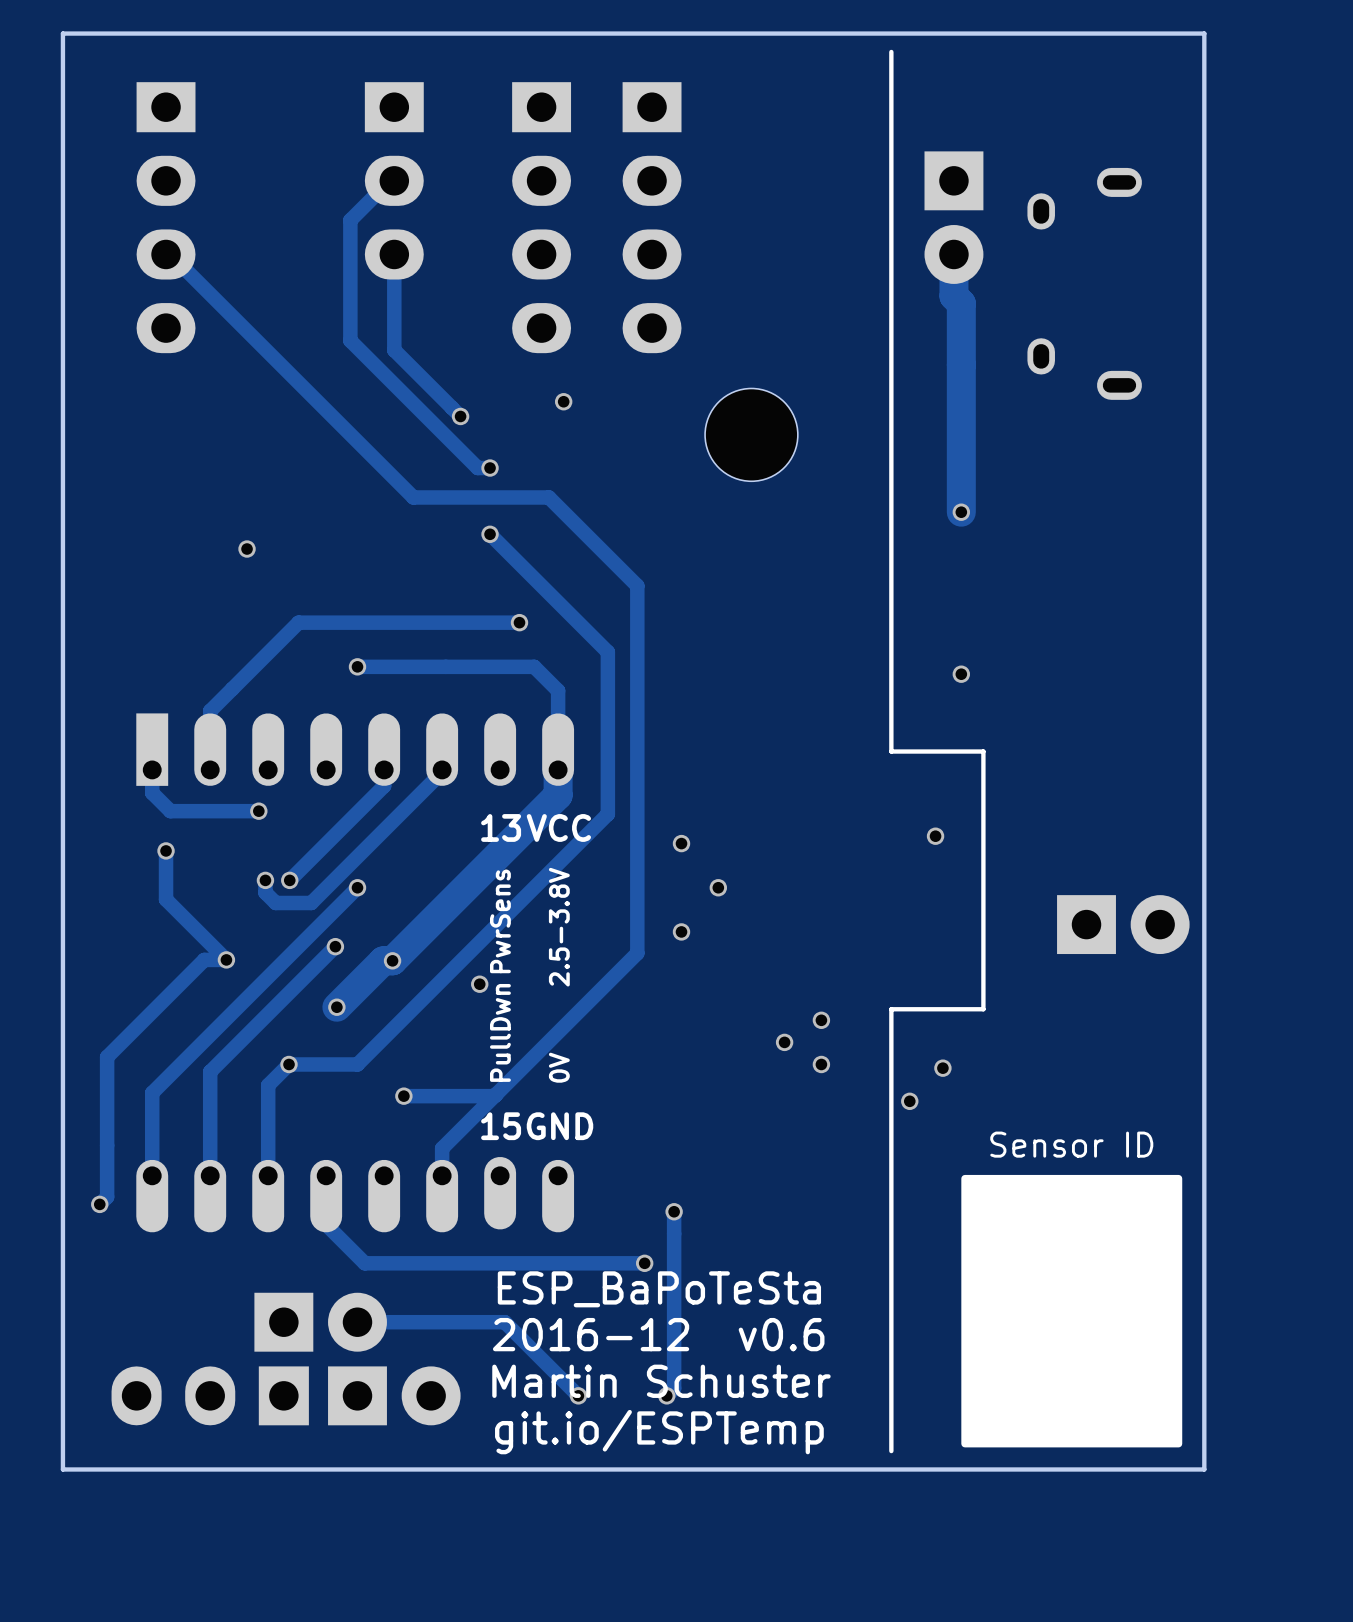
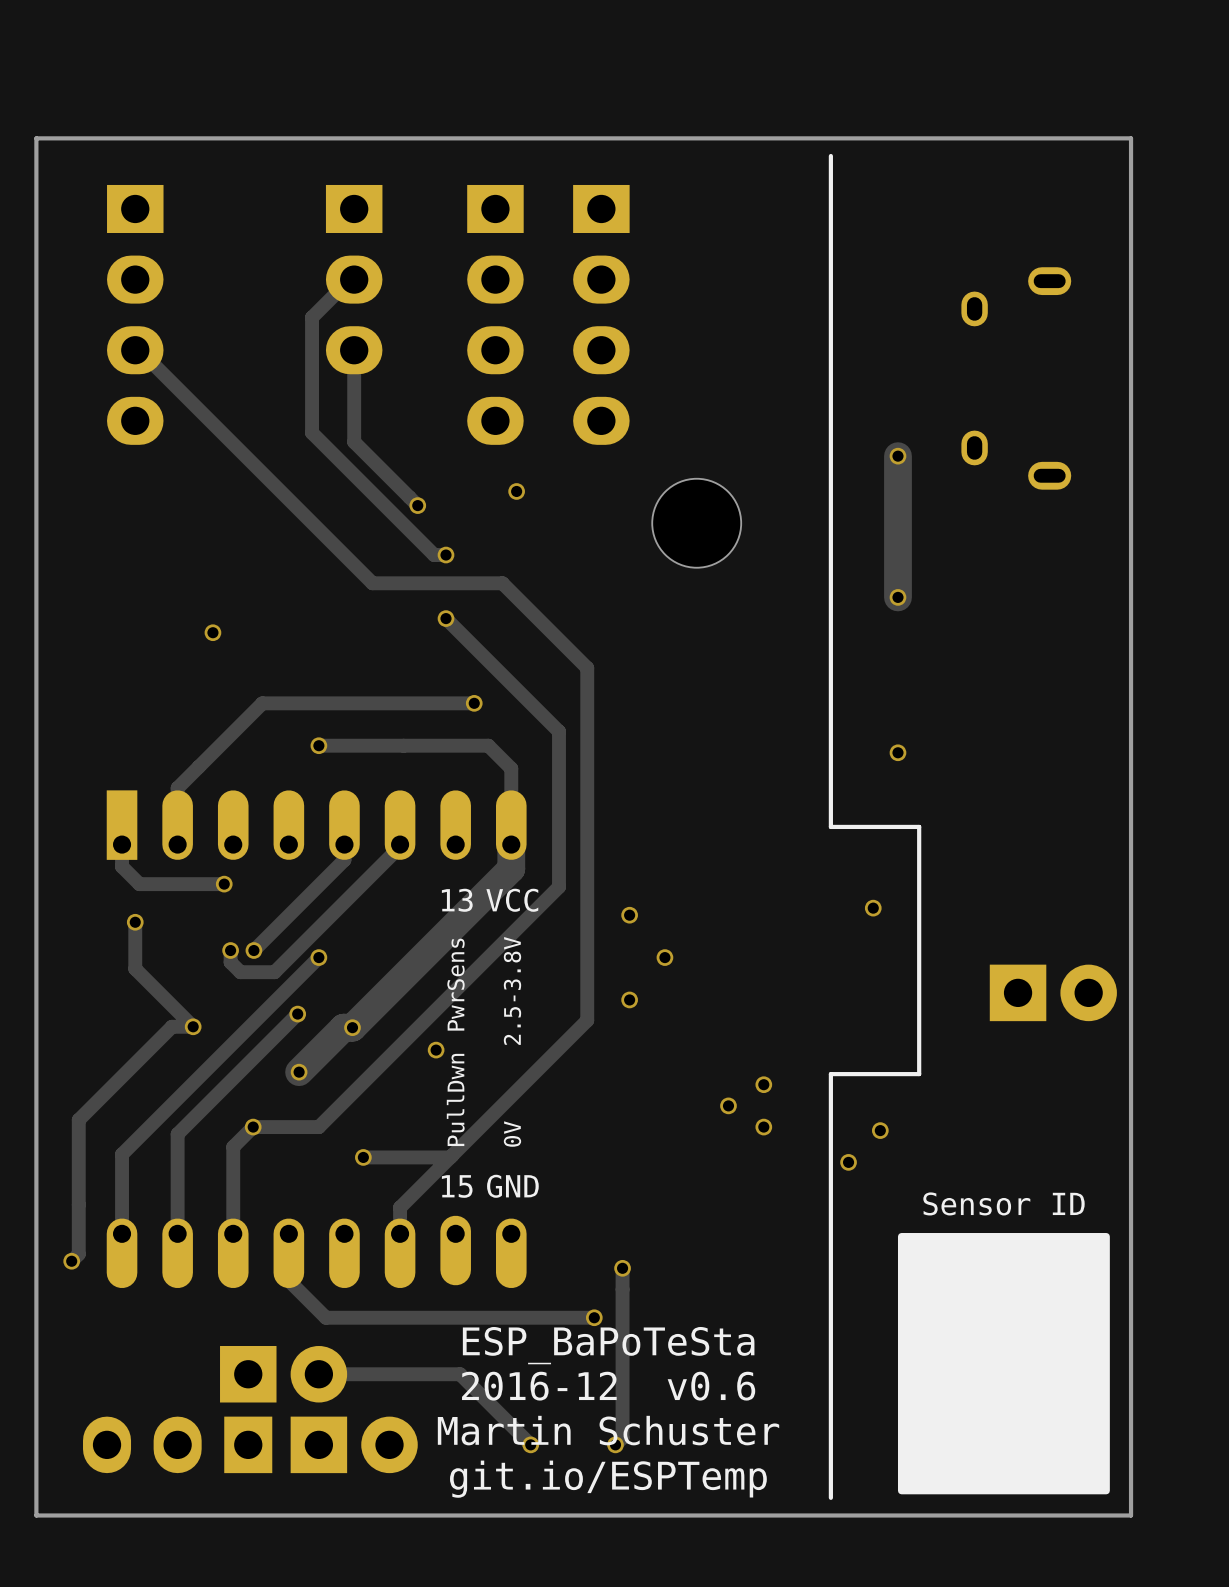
part: (953, 217) -> none
track: (953, 254) (953, 296) (961, 303) (961, 364) -> none
via: none -> (897, 456)

